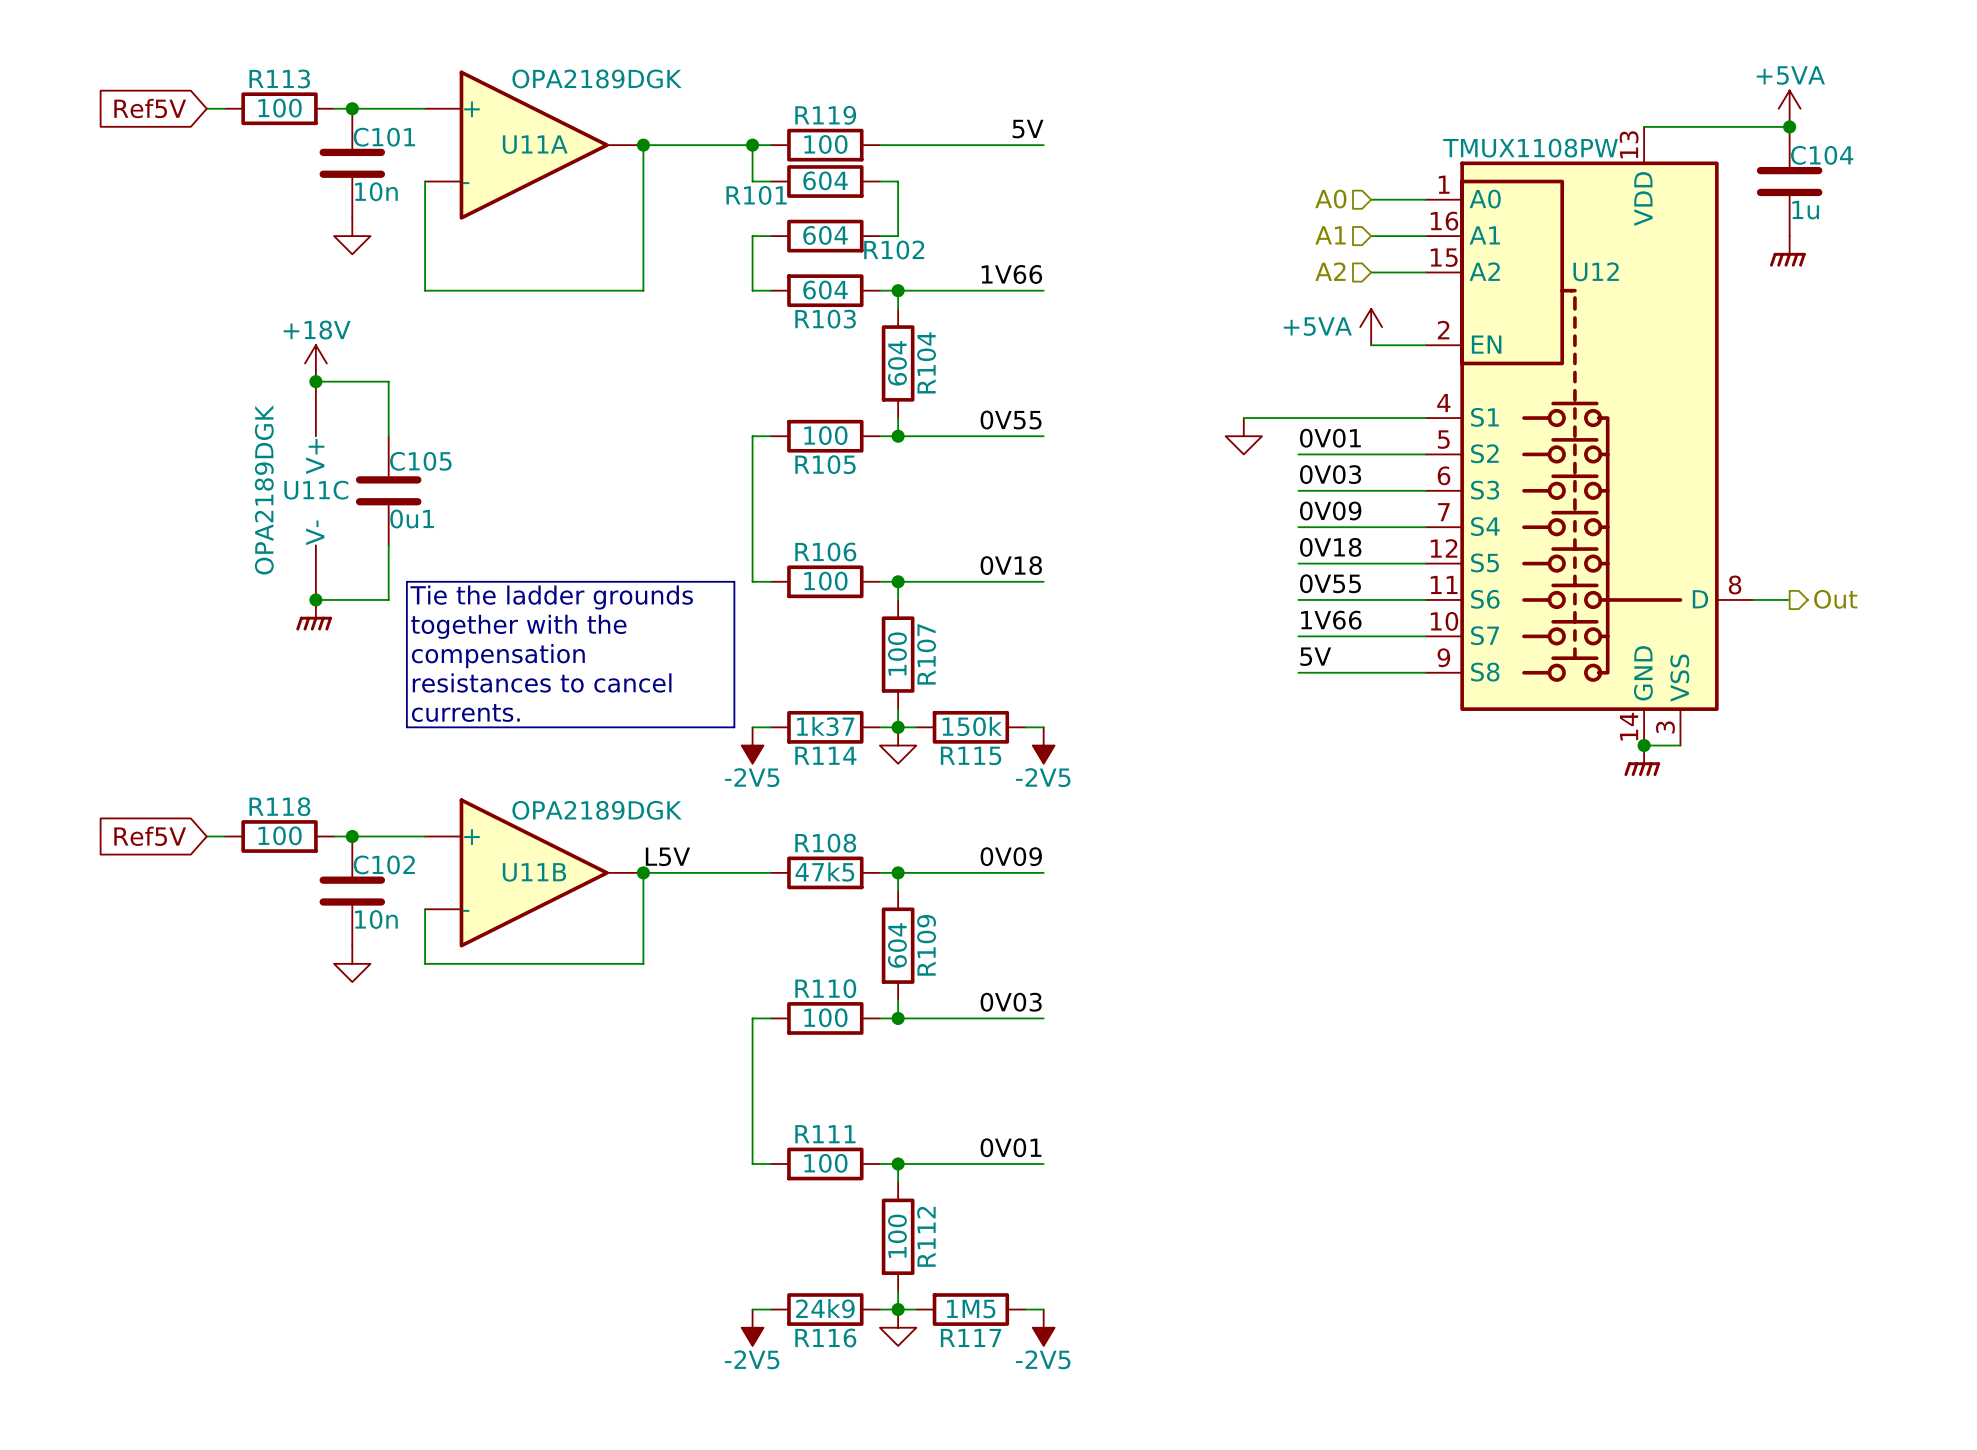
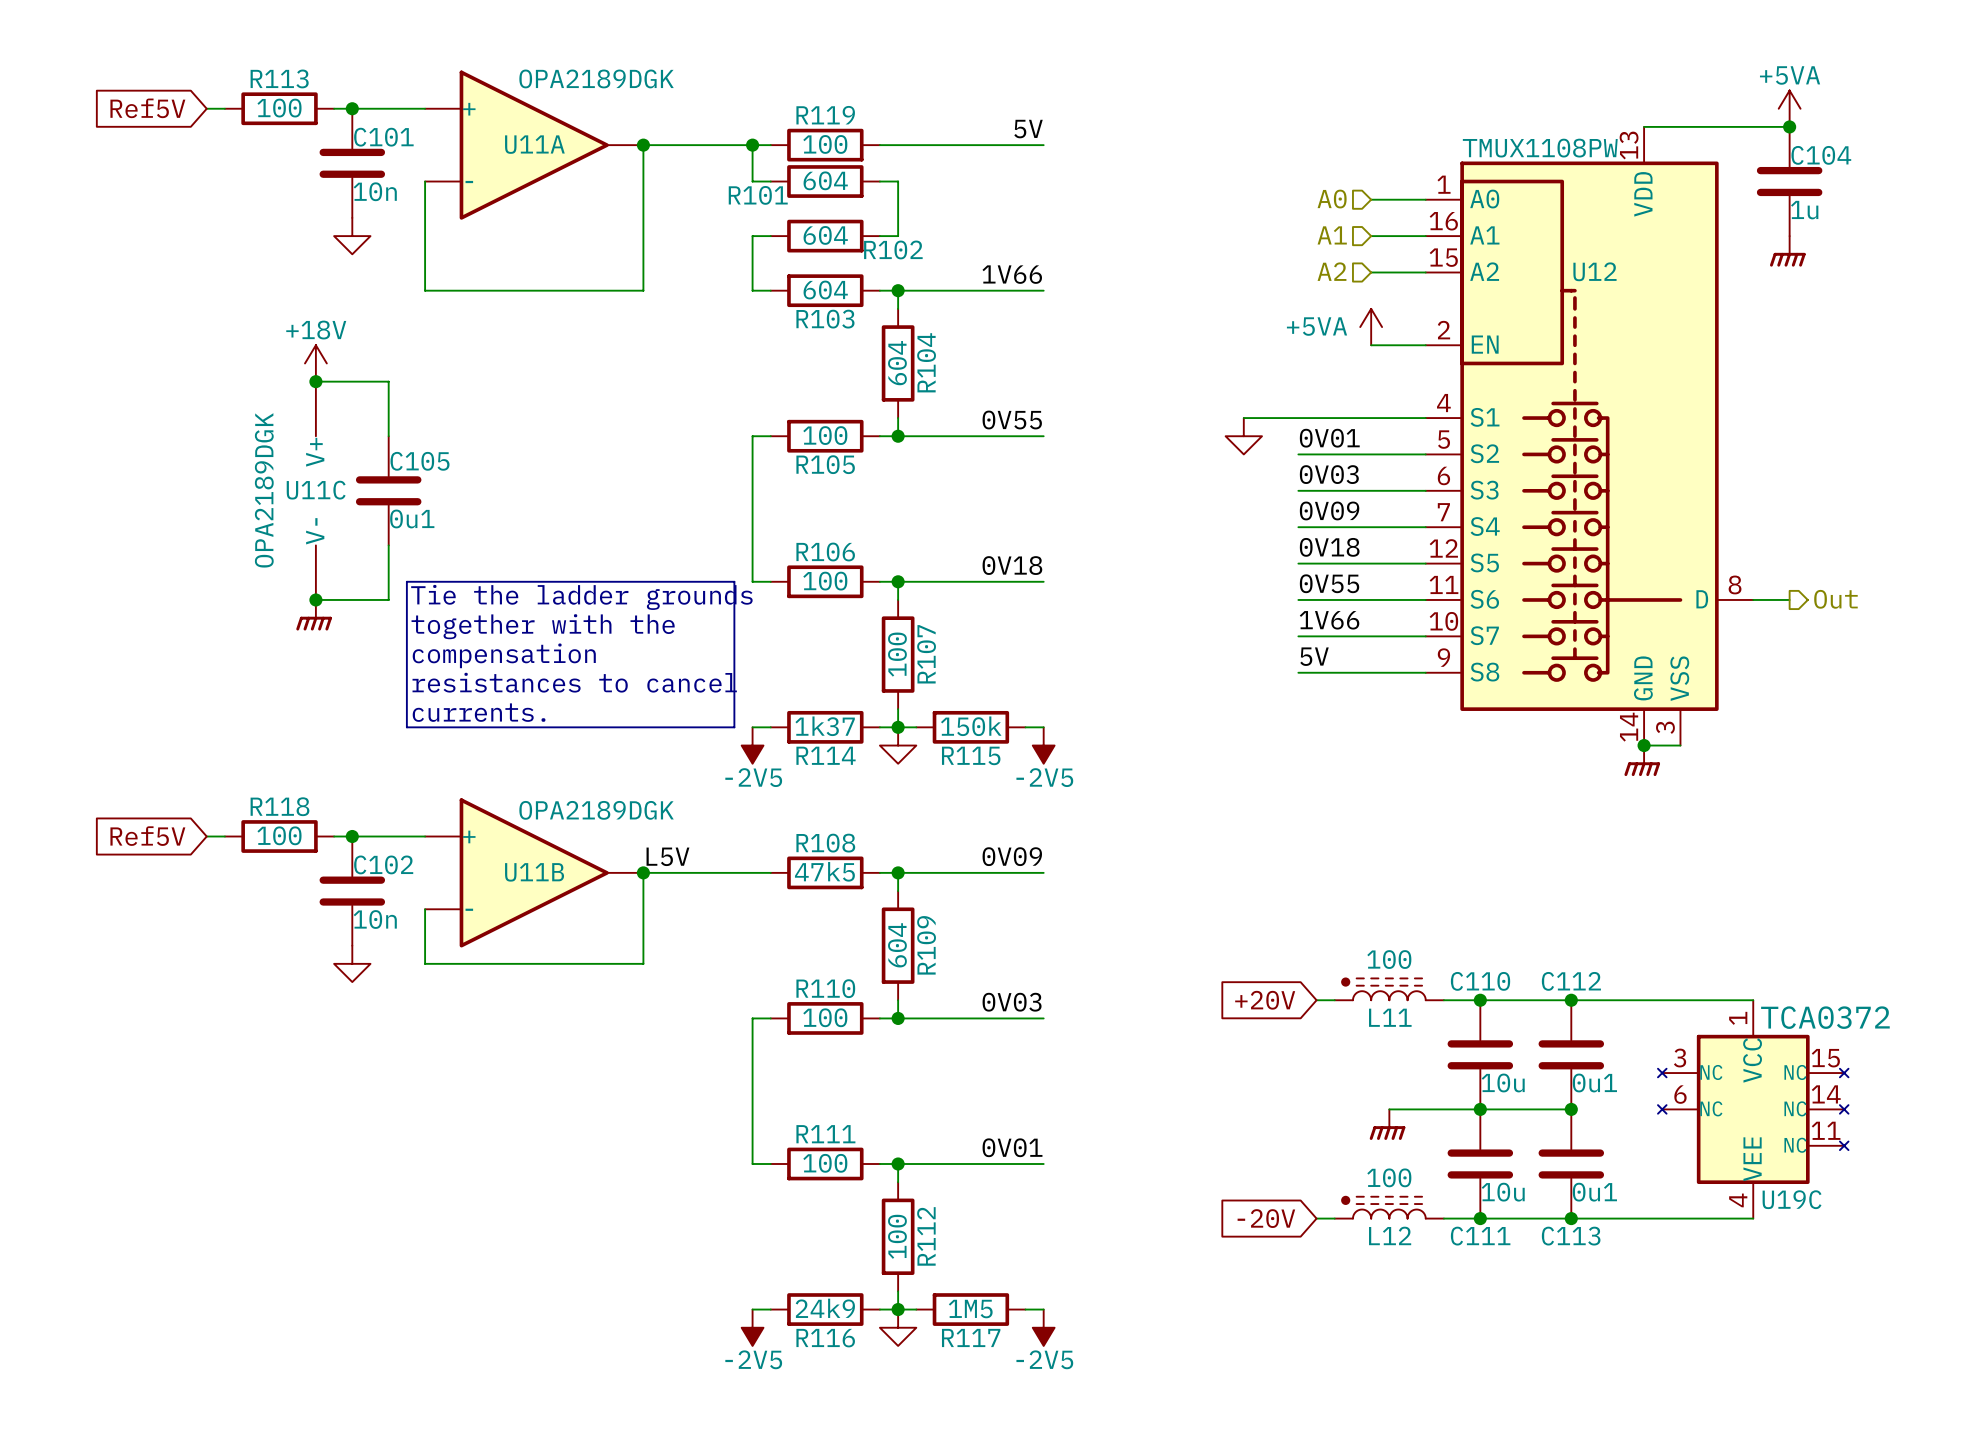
L11: none -> 100 (1389, 989)
global label: none -> +20V (1265, 1000)
wire: none -> (1316, 1000) (1334, 1000)
wire: none -> (1443, 1000) (1753, 1000)
junction: none -> (1480, 1000)
junction: none -> (1571, 1000)
C110: none -> 10u (1480, 1054)
C112: none -> 0u1 (1571, 1054)
wire: none -> (1389, 1109) (1571, 1109)
junction: none -> (1480, 1109)
junction: none -> (1571, 1109)
U19C: none -> TCA0372 (1753, 1109)
power symbol: none -> (1387, 1124)
C111: none -> 10u (1480, 1163)
C113: none -> 0u1 (1571, 1163)
L12: none -> 100 (1389, 1207)
global label: none -> -20V (1266, 1218)
wire: none -> (1316, 1218) (1334, 1218)
wire: none -> (1443, 1218) (1753, 1218)
junction: none -> (1480, 1218)
junction: none -> (1571, 1218)

